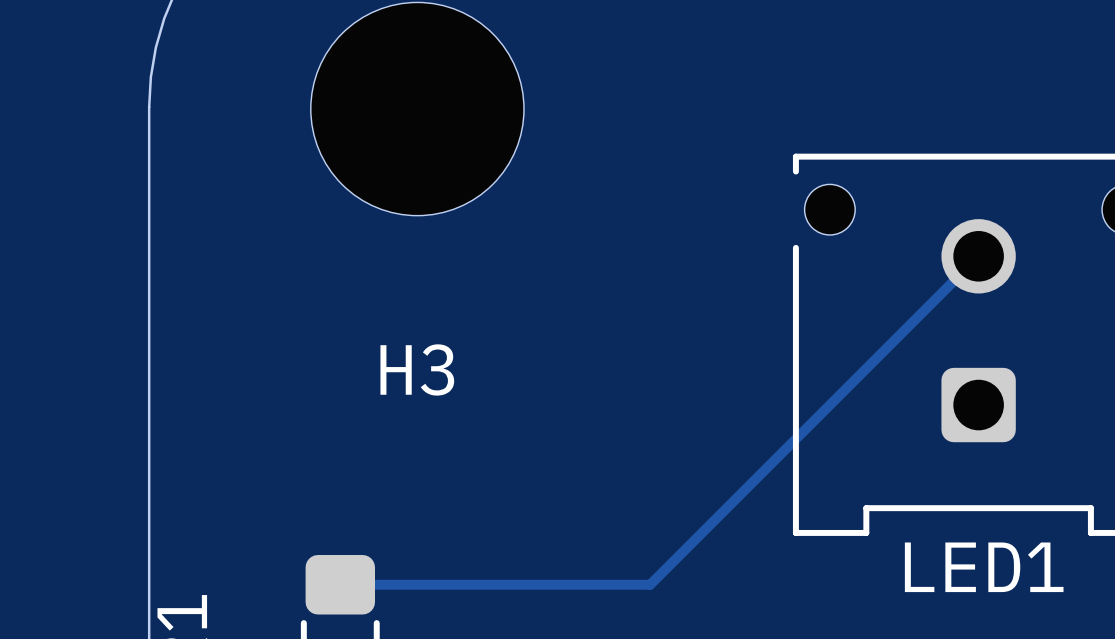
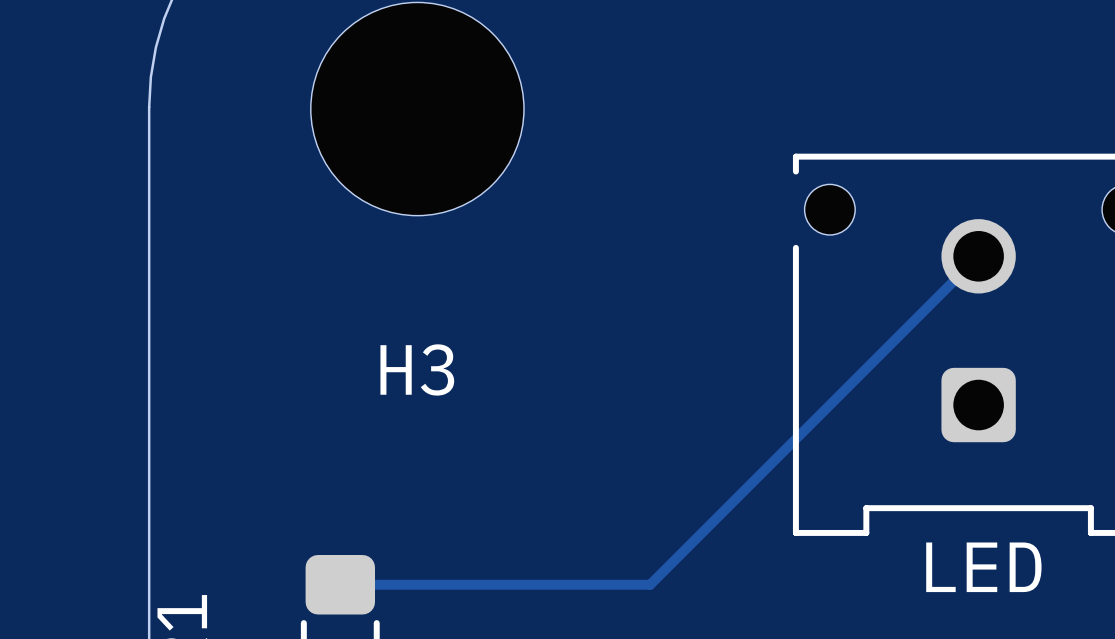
LED1 name: LED1 (984, 567) -> LED (983, 567)

